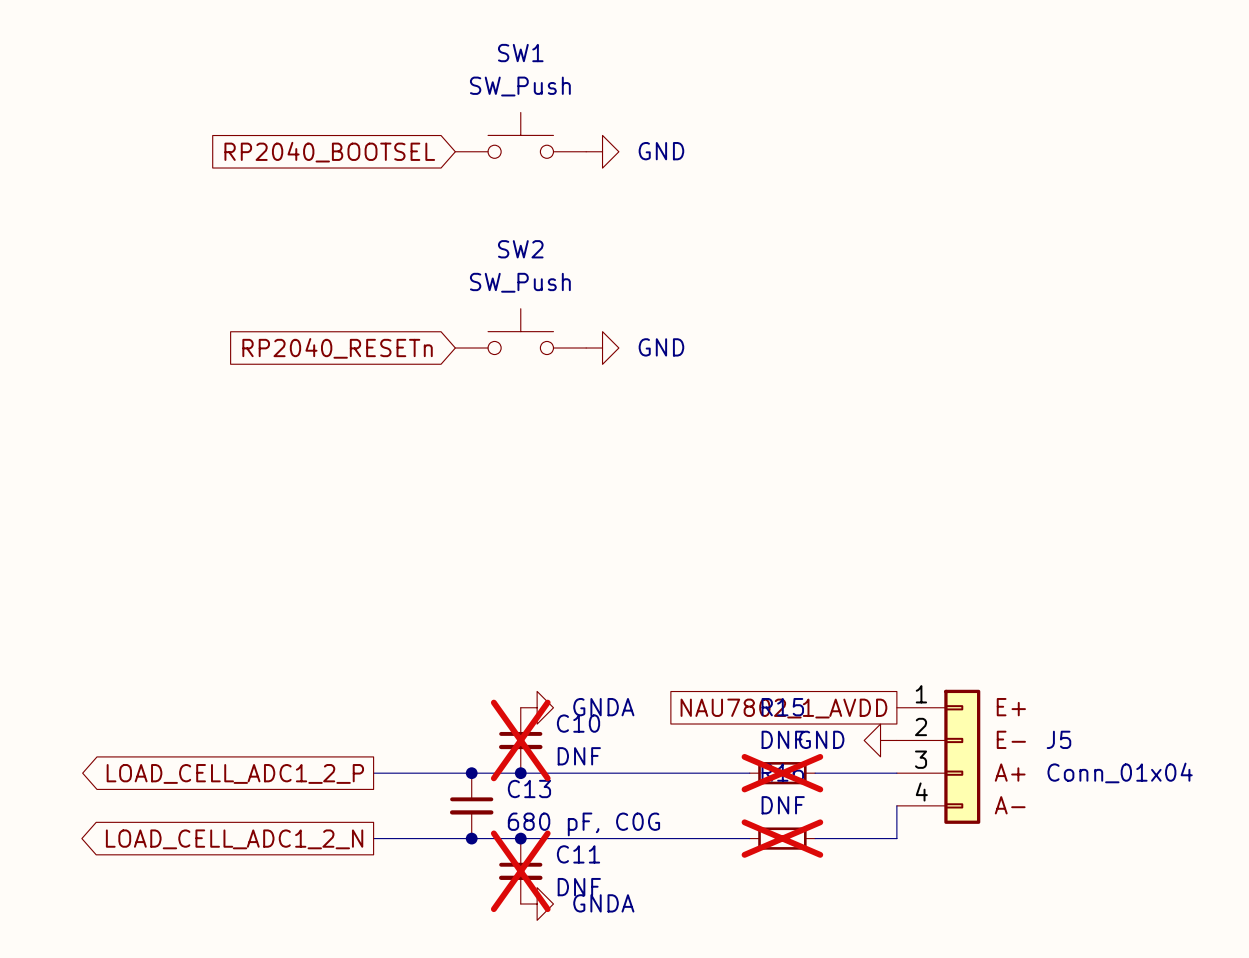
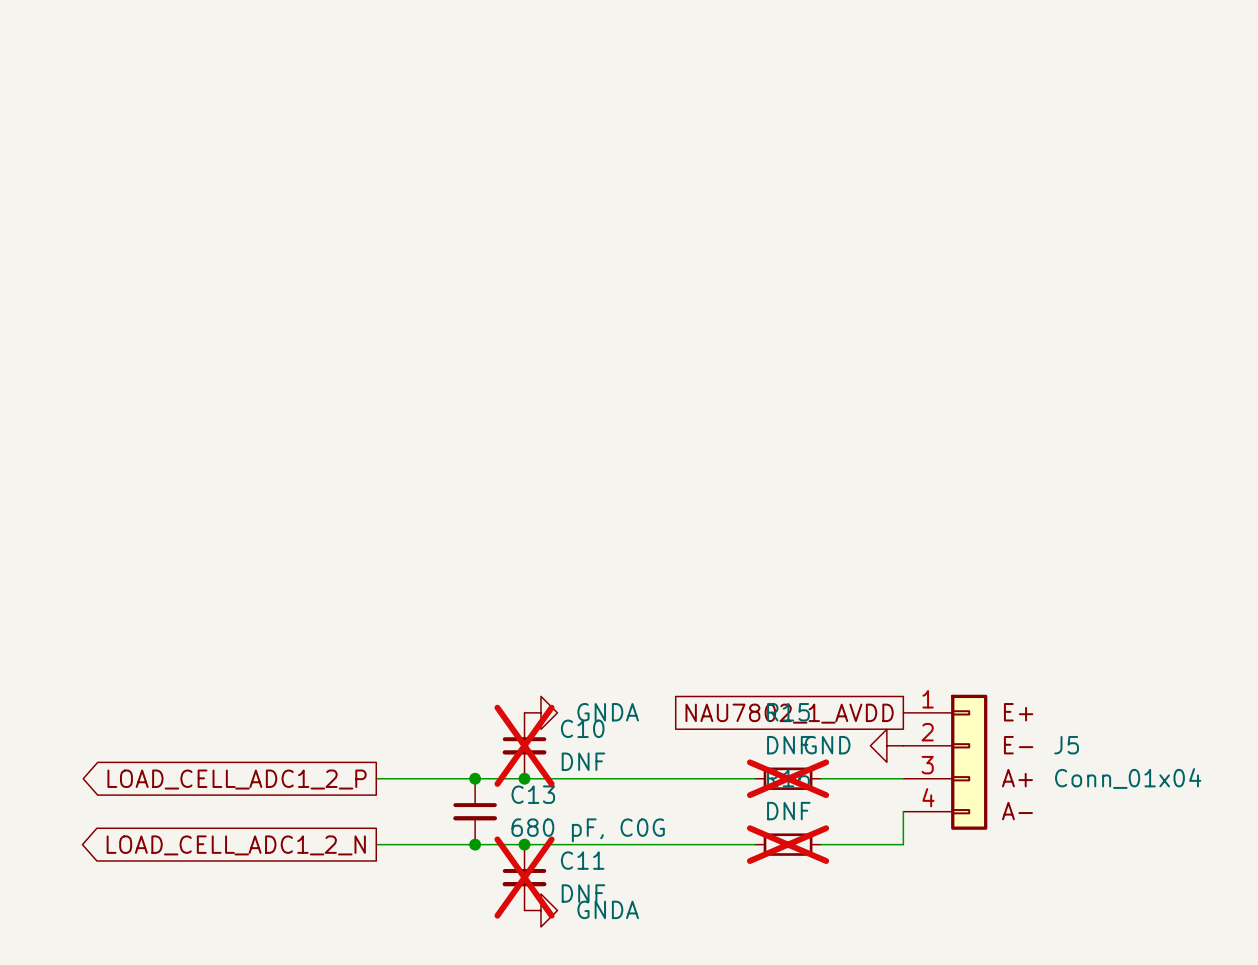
SW1: SW_Push (520, 135) -> none
power symbol: GND (602, 151) -> none
global label: RP2040_BOOTSEL (329, 152) -> none
SW2: SW_Push (520, 331) -> none
global label: RP2040_RESETn (337, 348) -> none
power symbol: GND (602, 348) -> none

